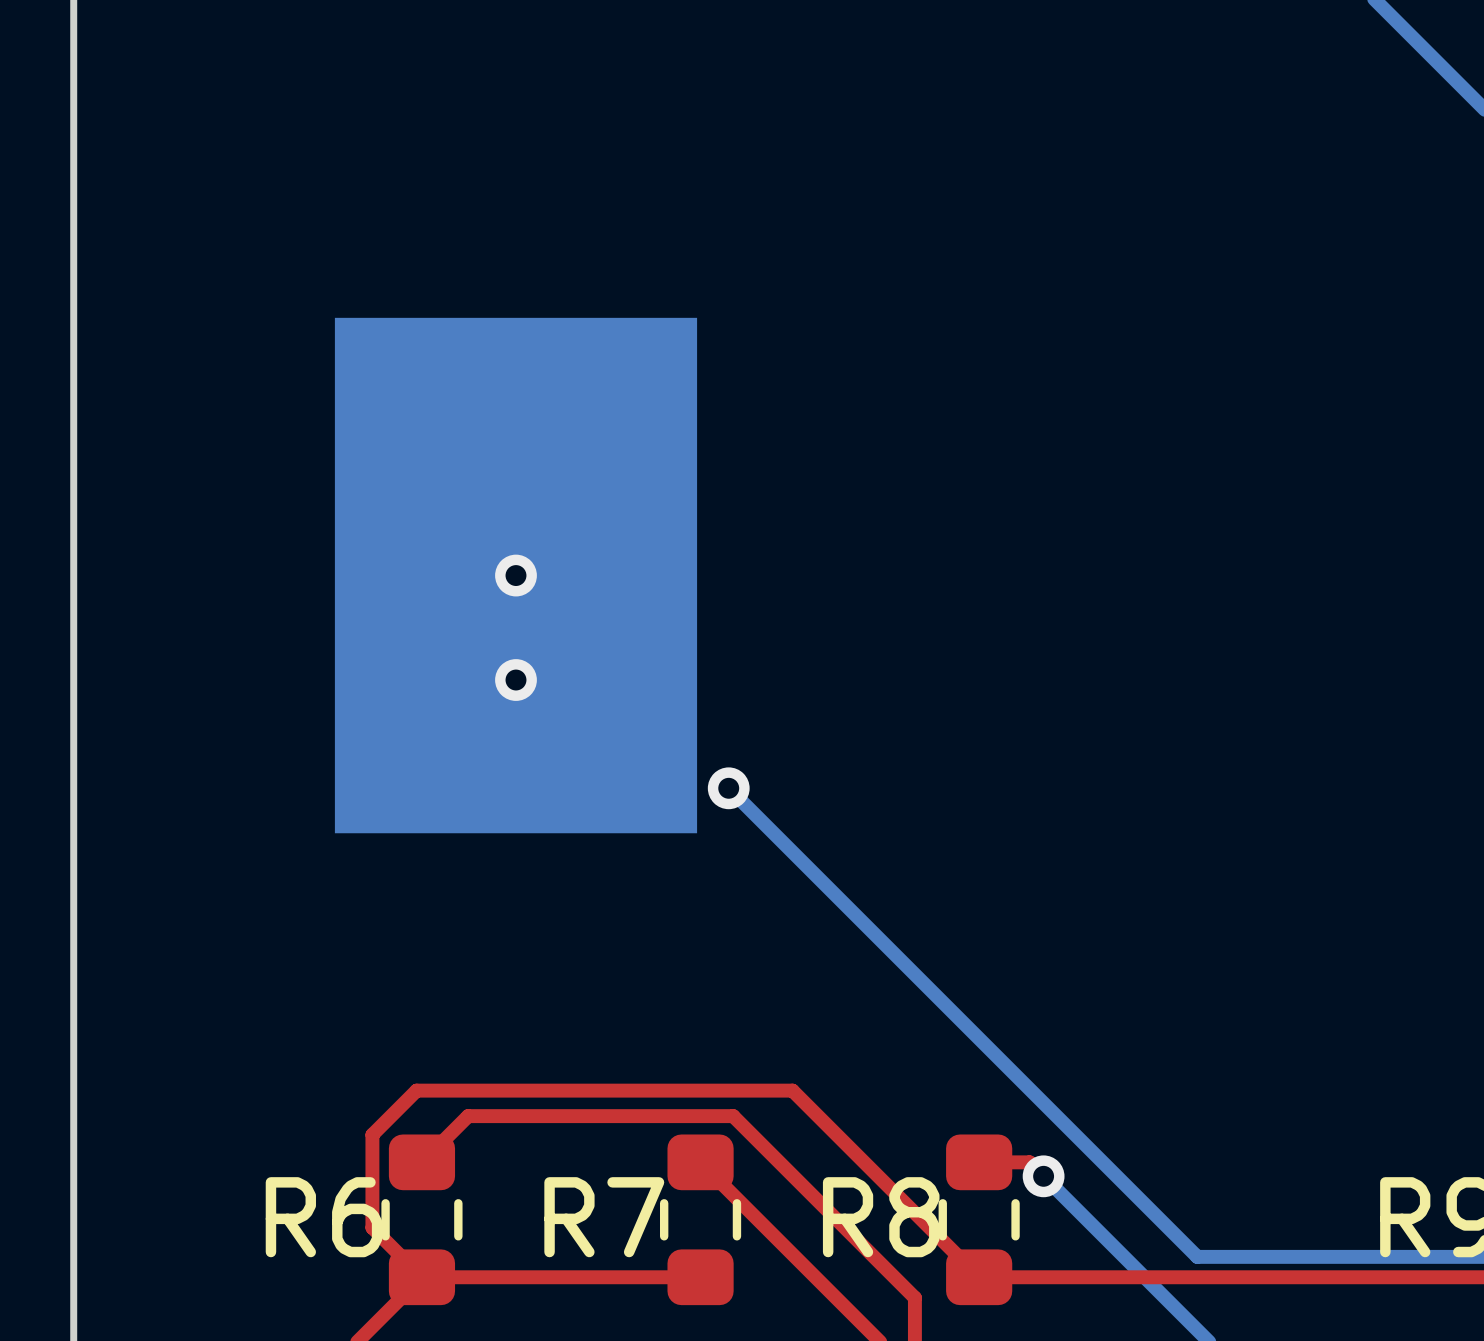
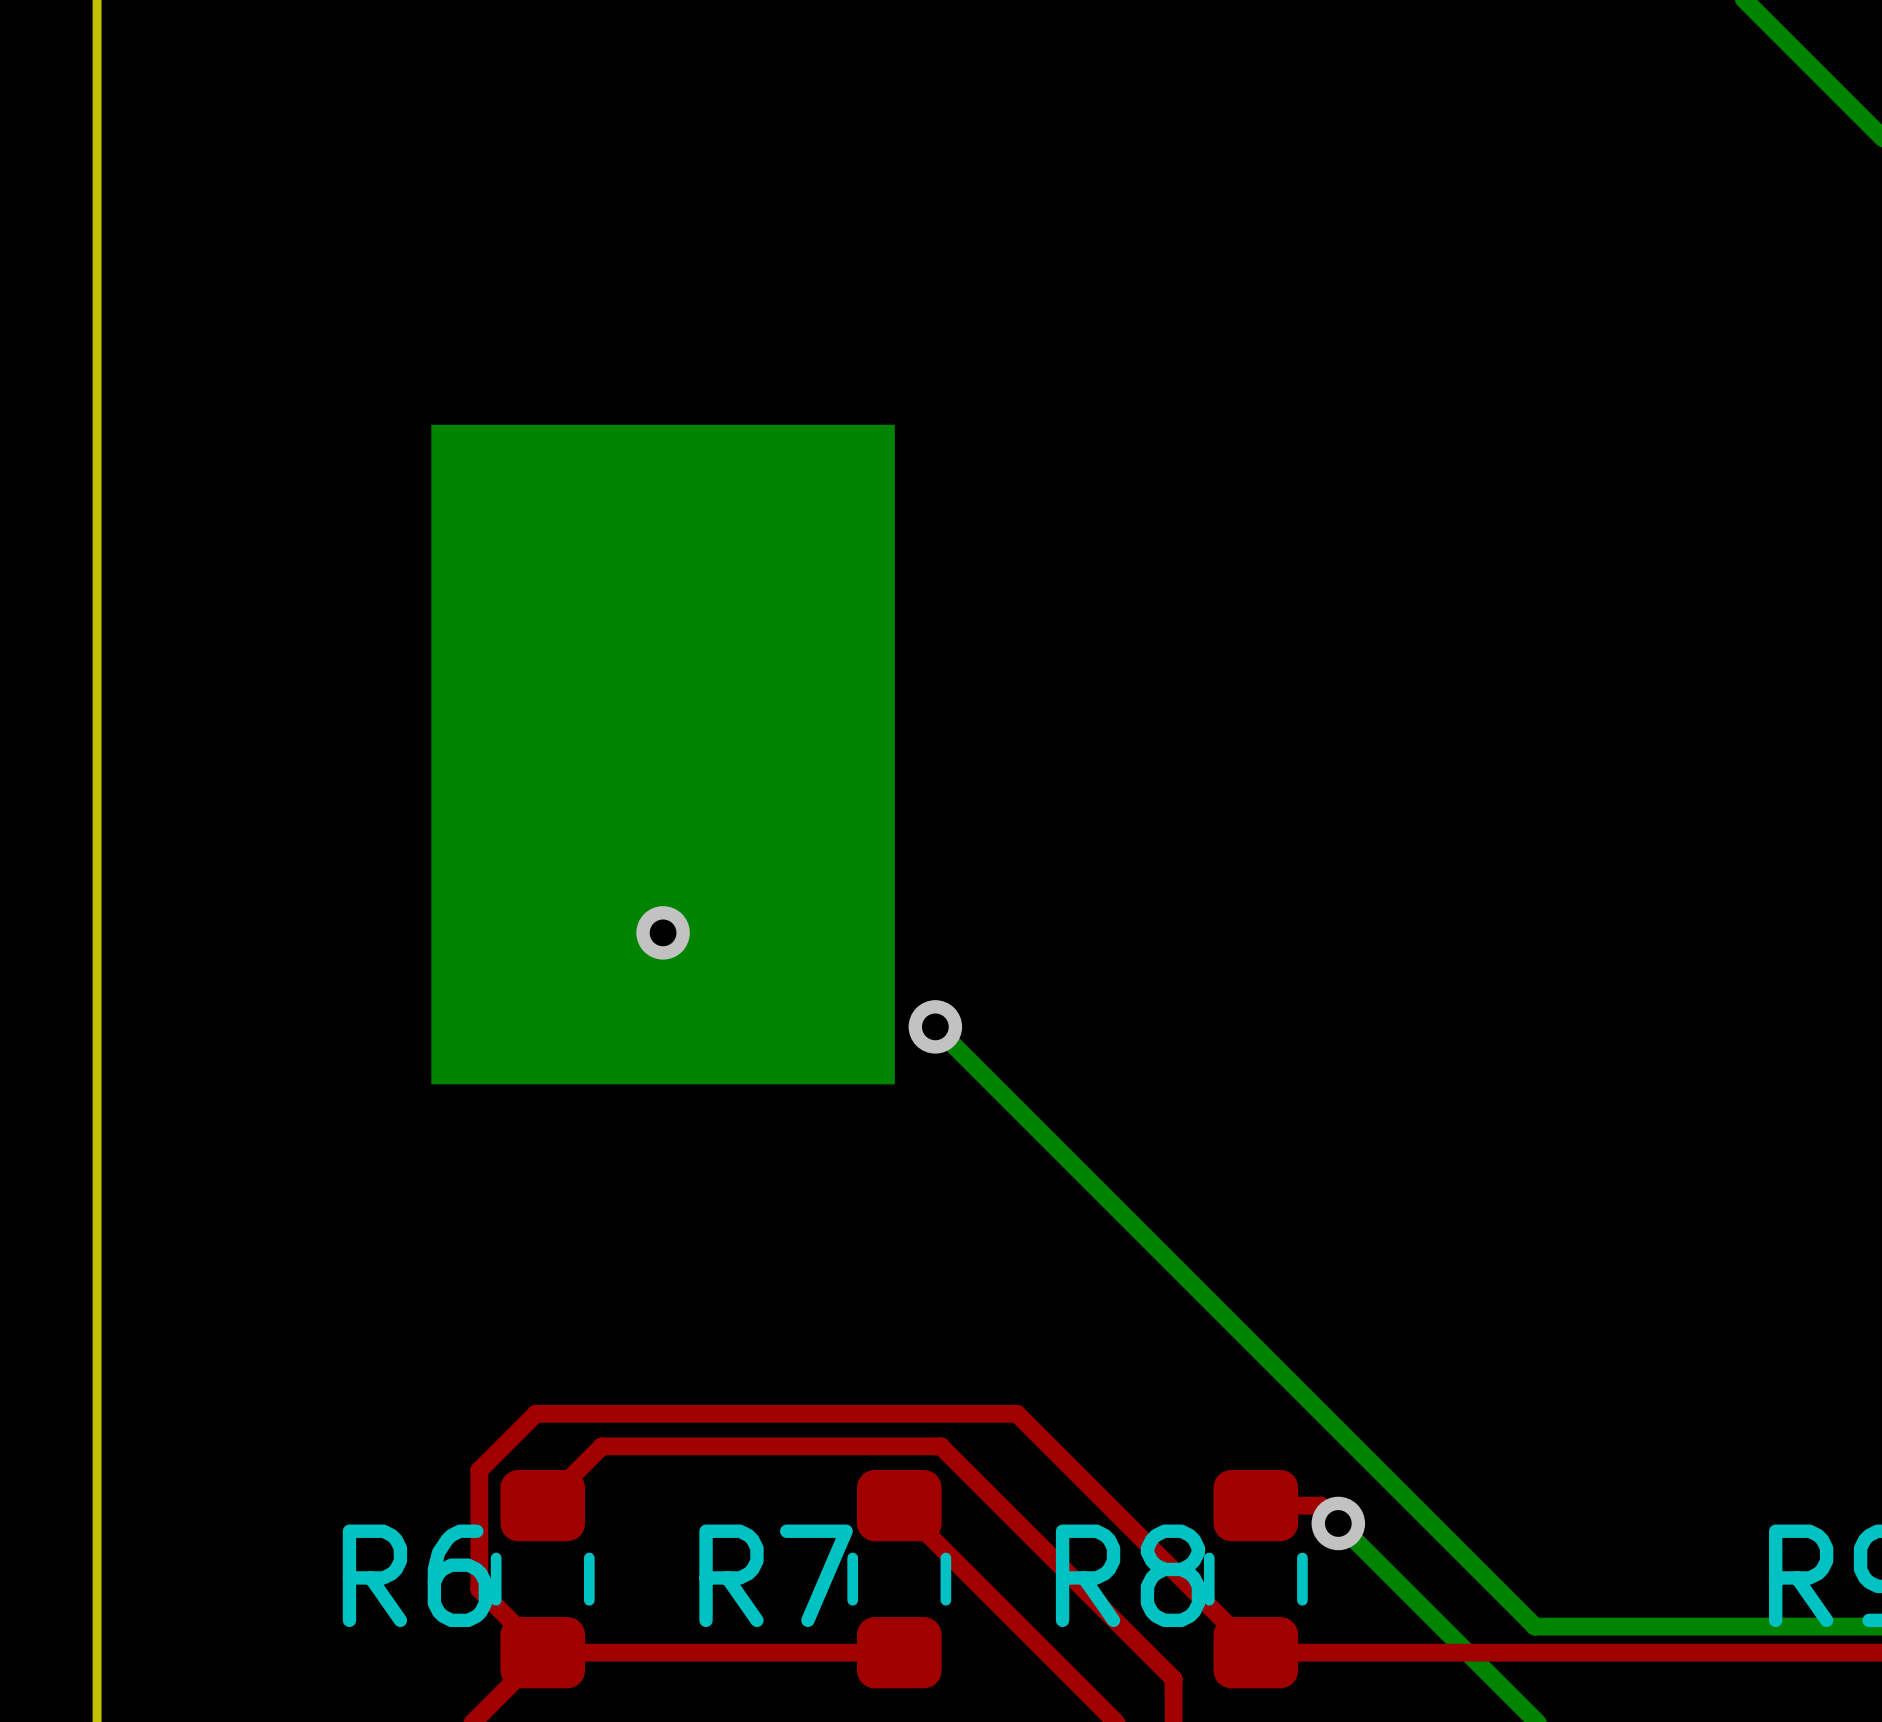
via: (515, 575) -> none
via position: (515, 680) -> (663, 932)

